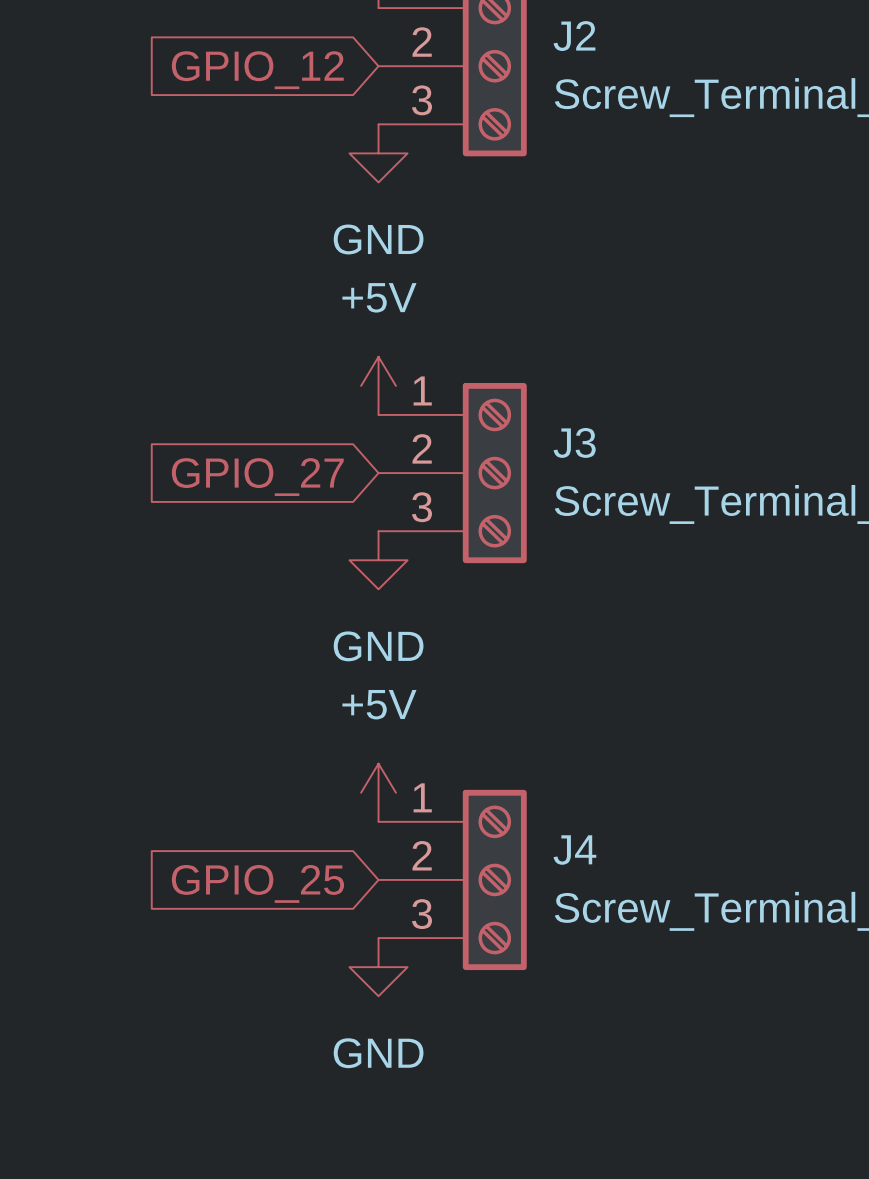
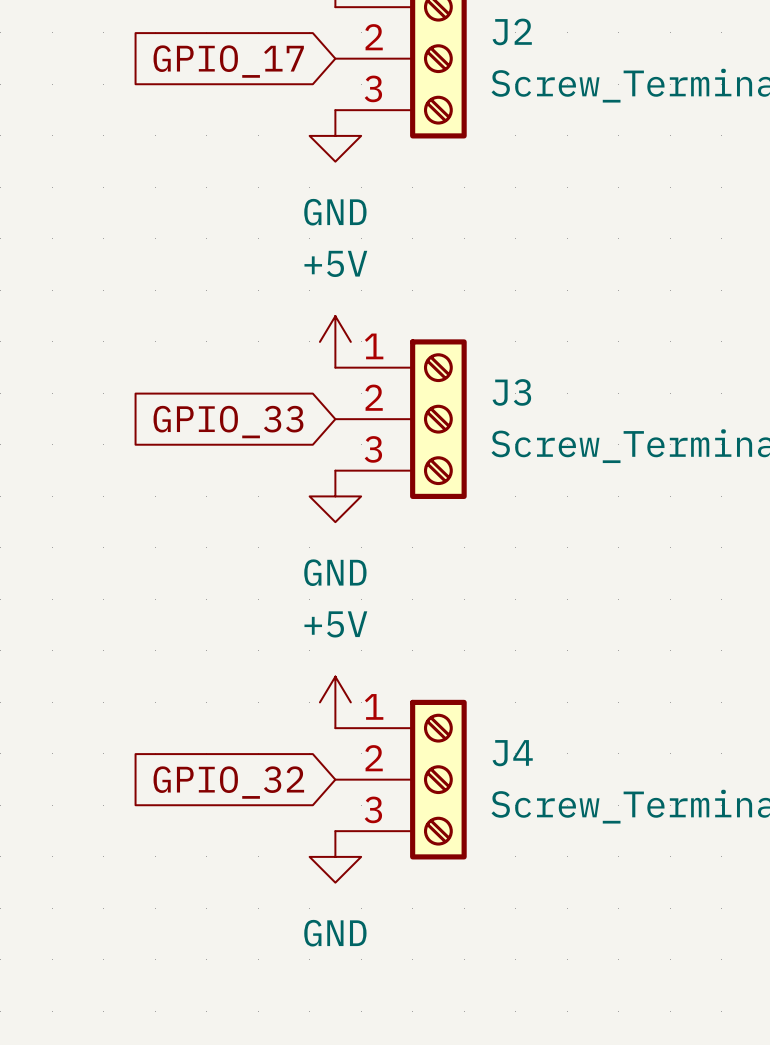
global label: GPIO_12 (257, 70) -> GPIO_17 (228, 61)
global label: GPIO_27 (257, 477) -> GPIO_33 (228, 422)
global label: GPIO_25 (257, 883) -> GPIO_32 (228, 782)

